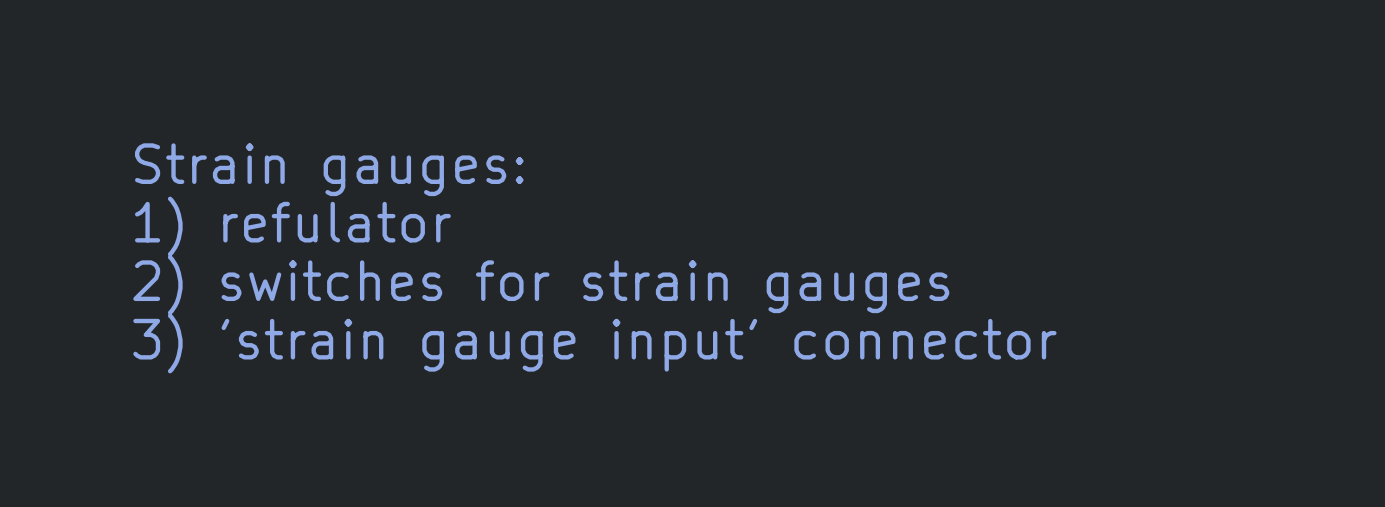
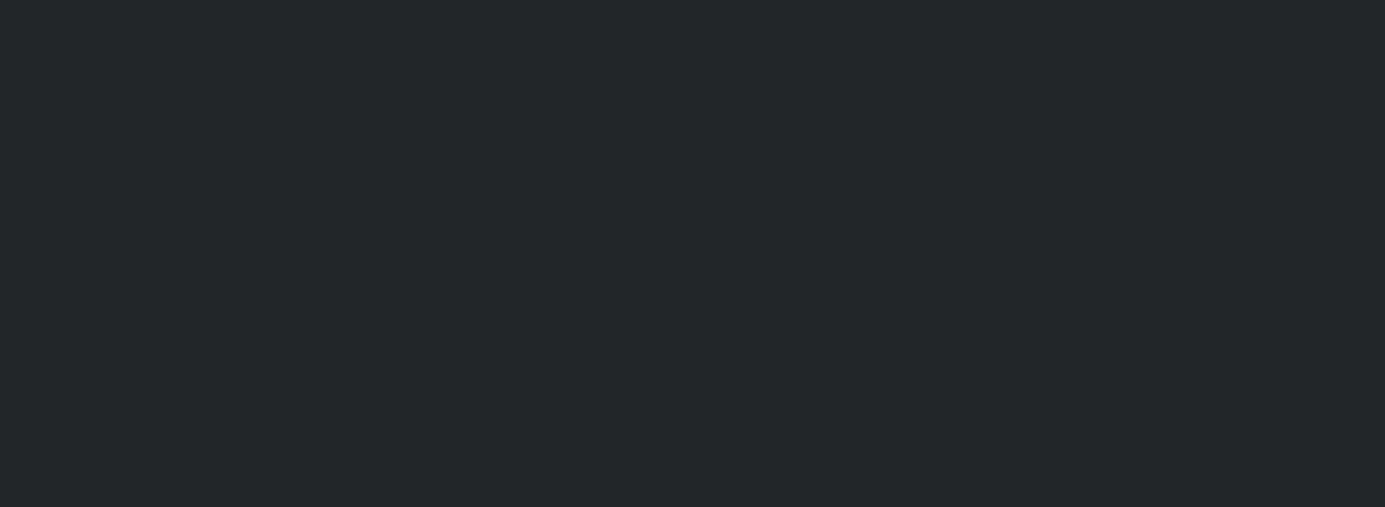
text: Strain gauges: (329, 169) -> none
text: 1) refulator (292, 226) -> none
text: 2) switches for strain gauges (541, 284) -> none
text: 3) 'strain gauge input' connector (594, 343) -> none

